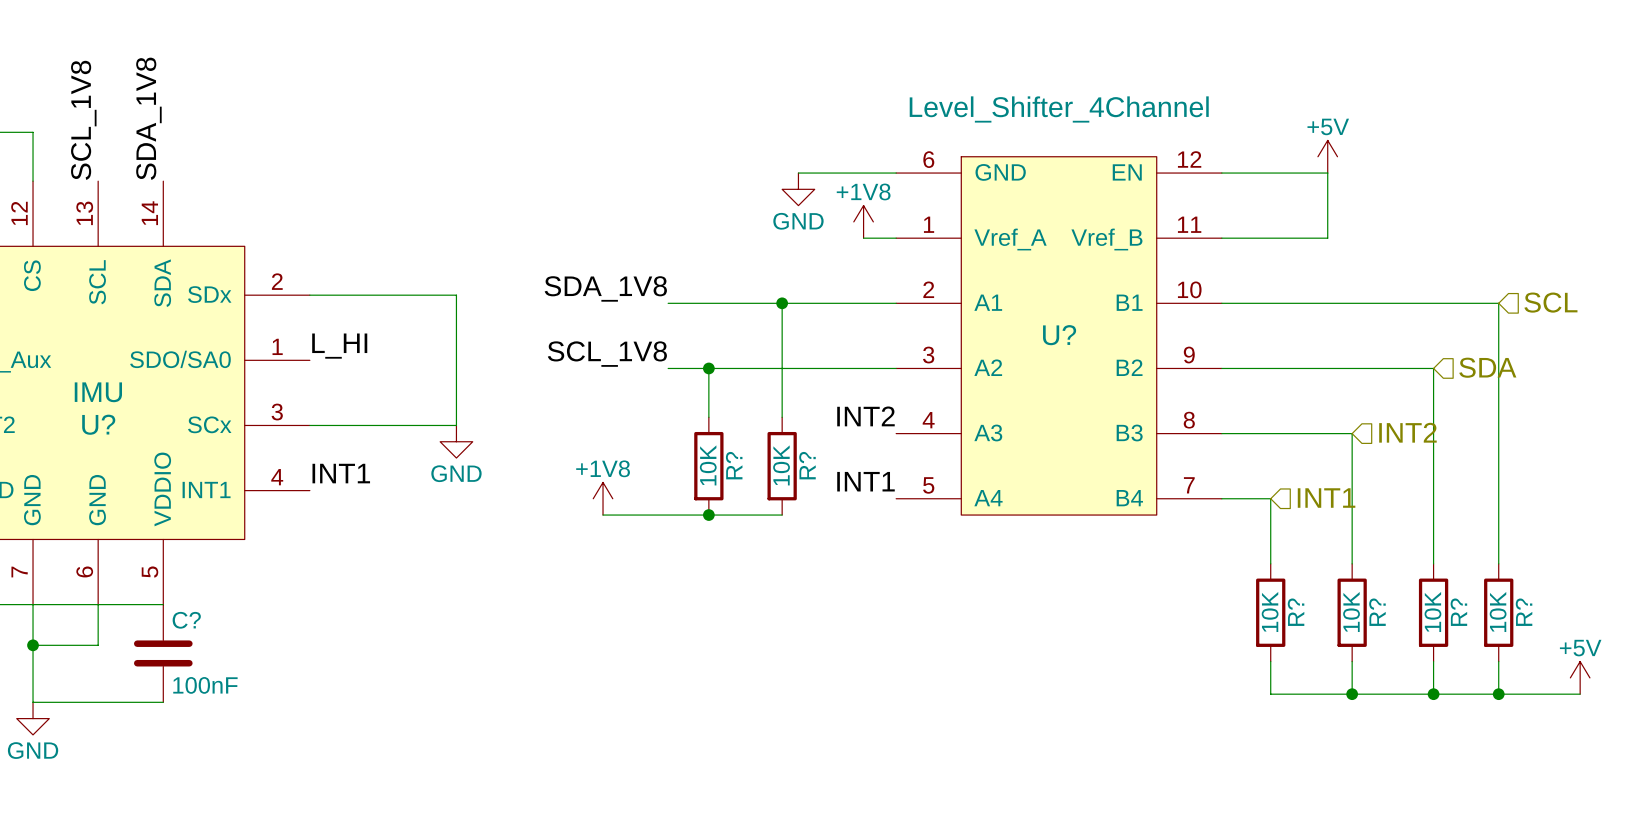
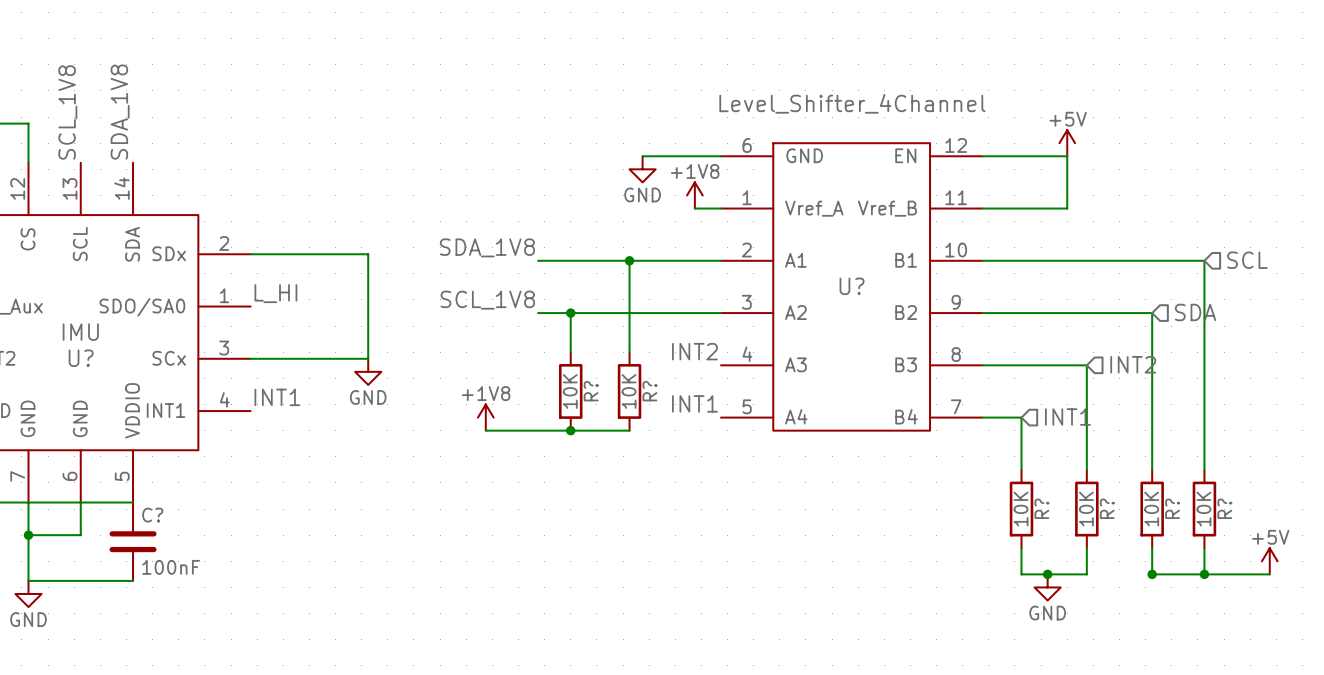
wire: (1352, 694) (1433, 694) -> none
junction position: (1352, 694) -> (1047, 574)
power symbol: none -> GND (1047, 587)

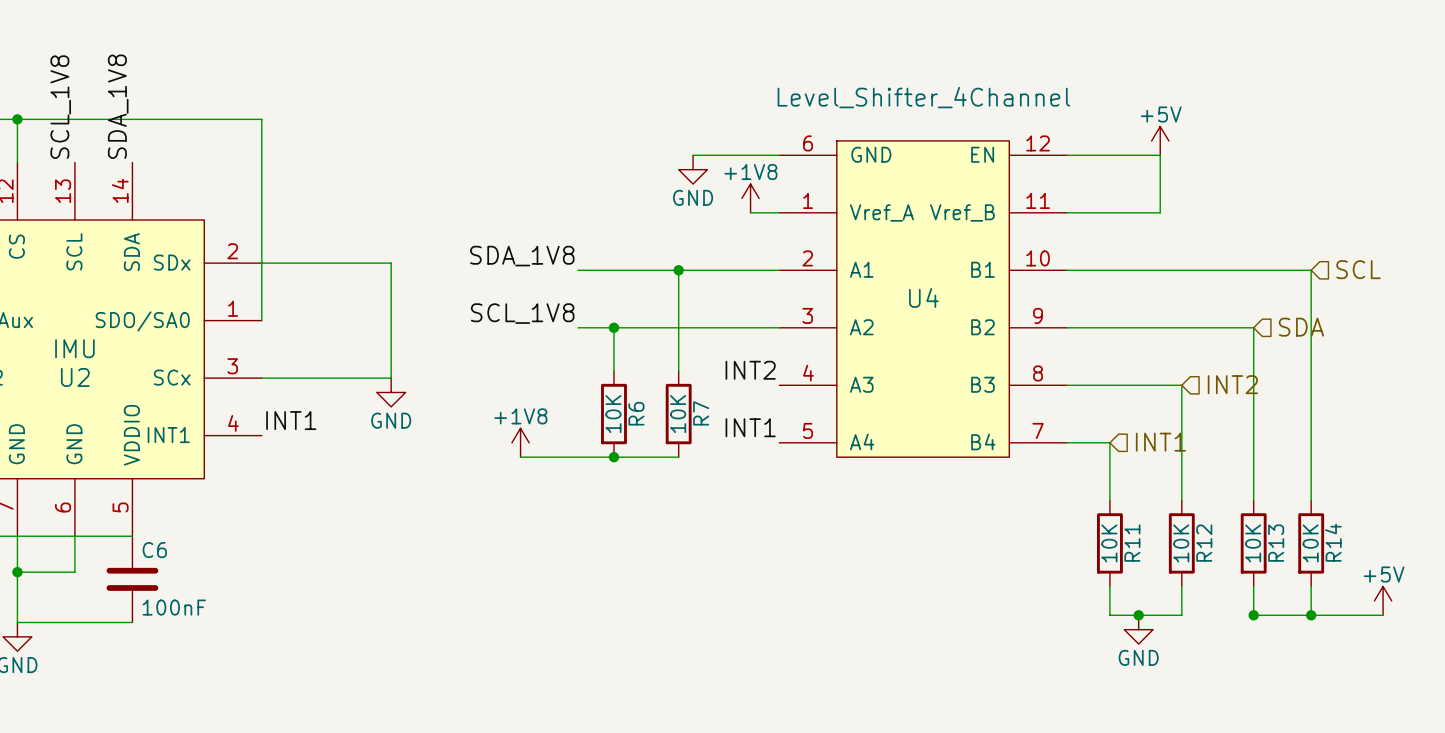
wire: none -> (17, 119) (261, 119) (261, 320)
junction: none -> (17, 119)
U? name: U? (852, 286) -> U4 (923, 297)
label: L_HI (275, 293) -> none
U? name: U? (81, 358) -> U2 (75, 377)
R? name: R? (591, 391) -> R6 (636, 413)
R? name: R? (649, 391) -> R7 (701, 413)
R? name: R? (1041, 508) -> R11 (1132, 543)
R? name: R? (1107, 508) -> R12 (1204, 543)
R? name: R? (1172, 508) -> R13 (1276, 543)
R? name: R? (1224, 508) -> R14 (1333, 542)
C? name: C? (152, 515) -> C6 (154, 550)

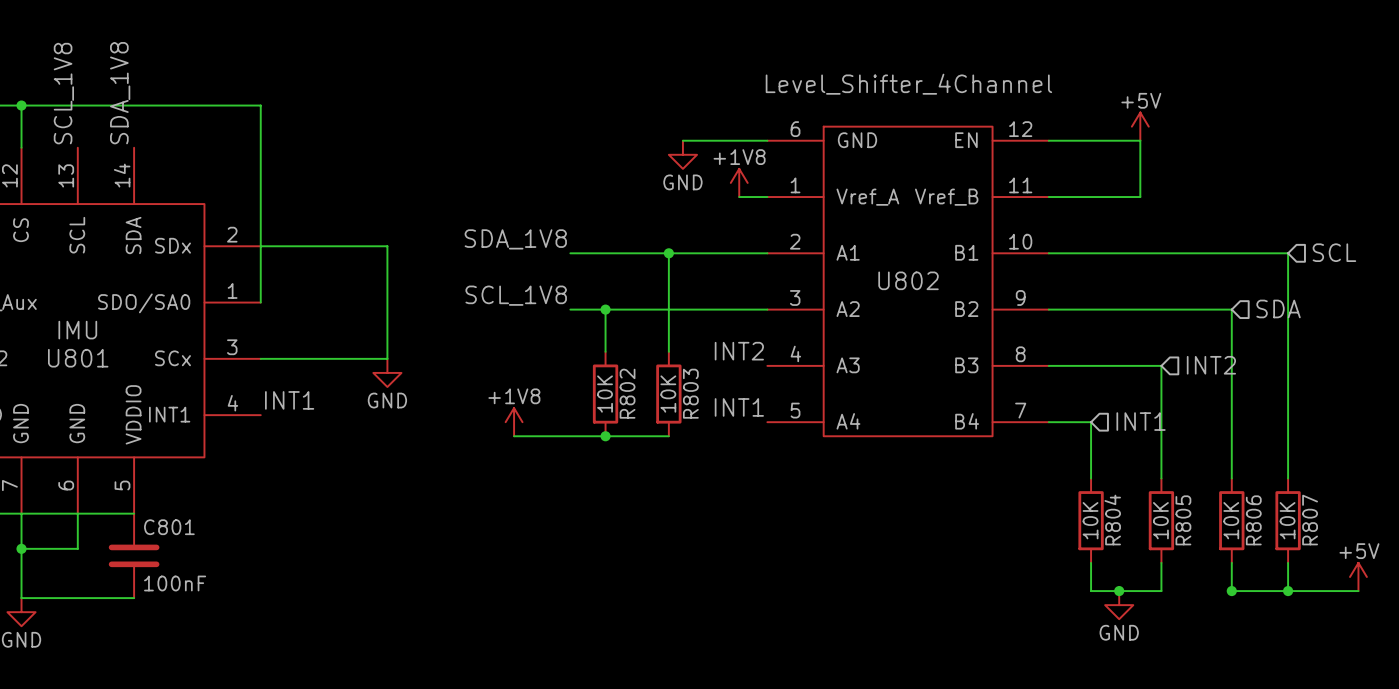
U4 name: U4 (923, 297) -> U802 (908, 280)
U2 name: U2 (75, 377) -> U801 (78, 358)
R6 name: R6 (636, 413) -> R802 (627, 393)
R7 name: R7 (701, 413) -> R803 (690, 393)
R14 name: R14 (1333, 542) -> R807 (1310, 520)
R11 name: R11 (1132, 543) -> R804 (1112, 520)
R12 name: R12 (1204, 543) -> R805 (1183, 520)
R13 name: R13 (1276, 543) -> R806 (1253, 520)
C6 name: C6 (154, 550) -> C801 (169, 527)

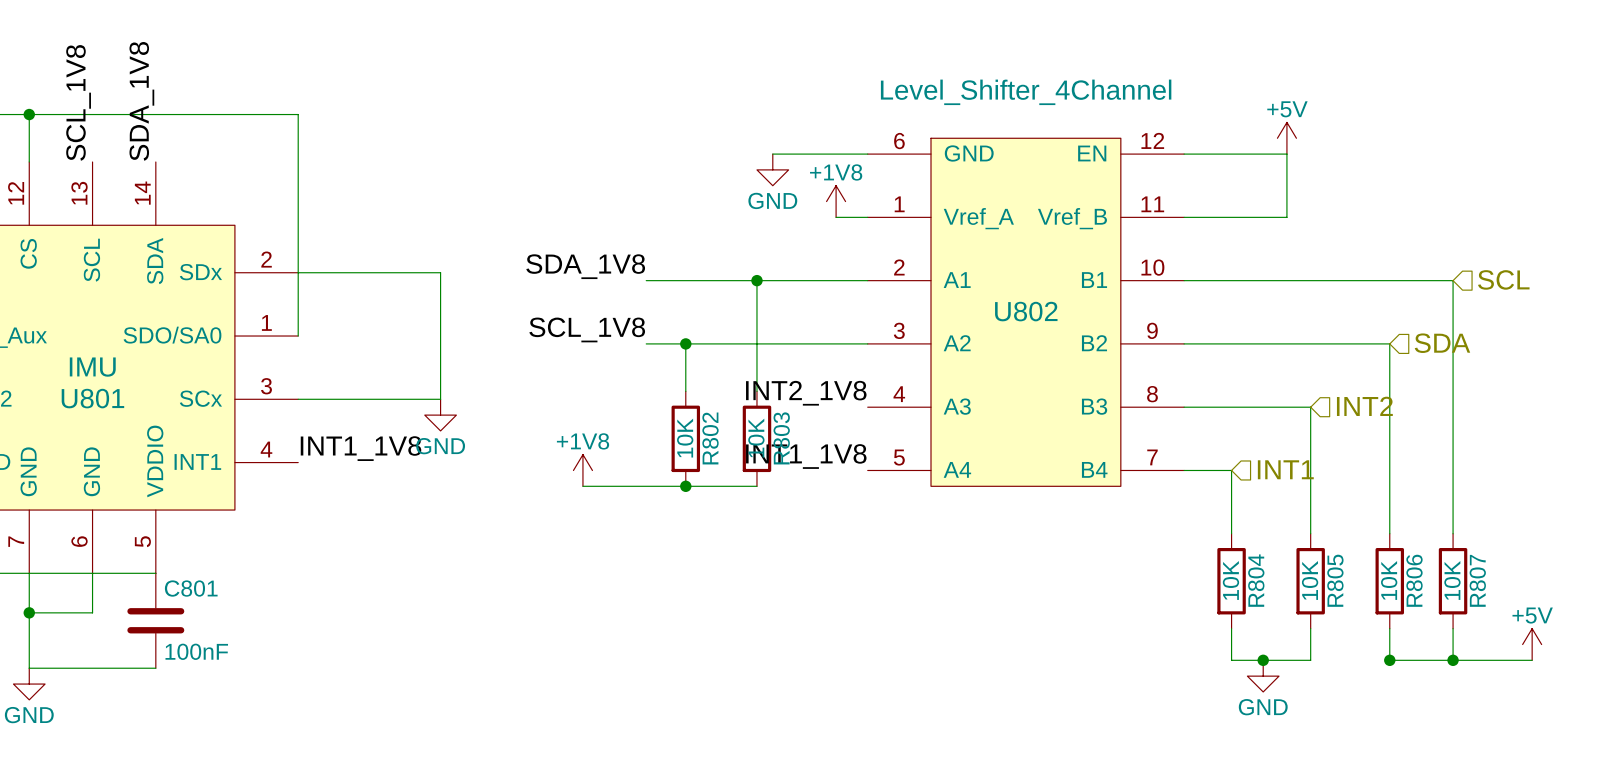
label: INT2 (739, 351) -> INT2_1V8 (806, 393)
label: INT1 (289, 400) -> INT1_1V8 (361, 448)
label: INT1 (739, 407) -> INT1_1V8 (806, 456)

